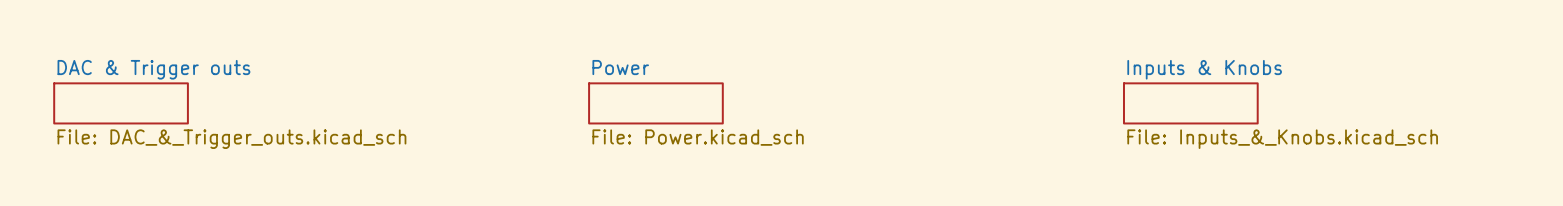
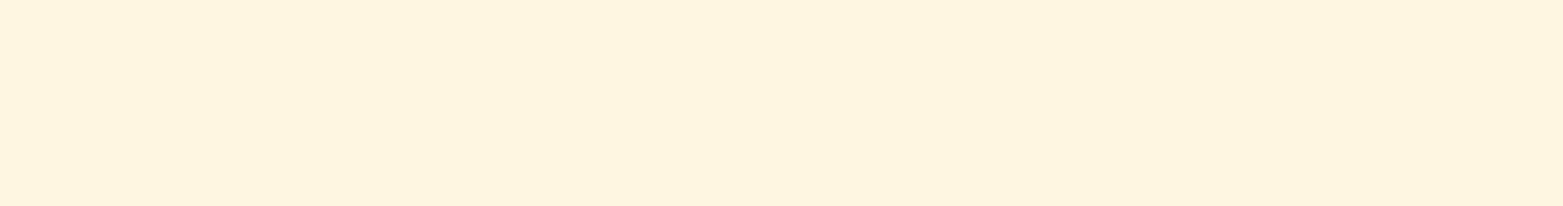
sheet DAC & Trigger outs: File: DAC_&_Trigger_outs.kicad_sch (121, 103) -> none
sheet Power: File: Power.kicad_sch (655, 103) -> none
sheet Inputs & Knobs: File: Inputs_&_Knobs.kicad_sch (1190, 103) -> none

